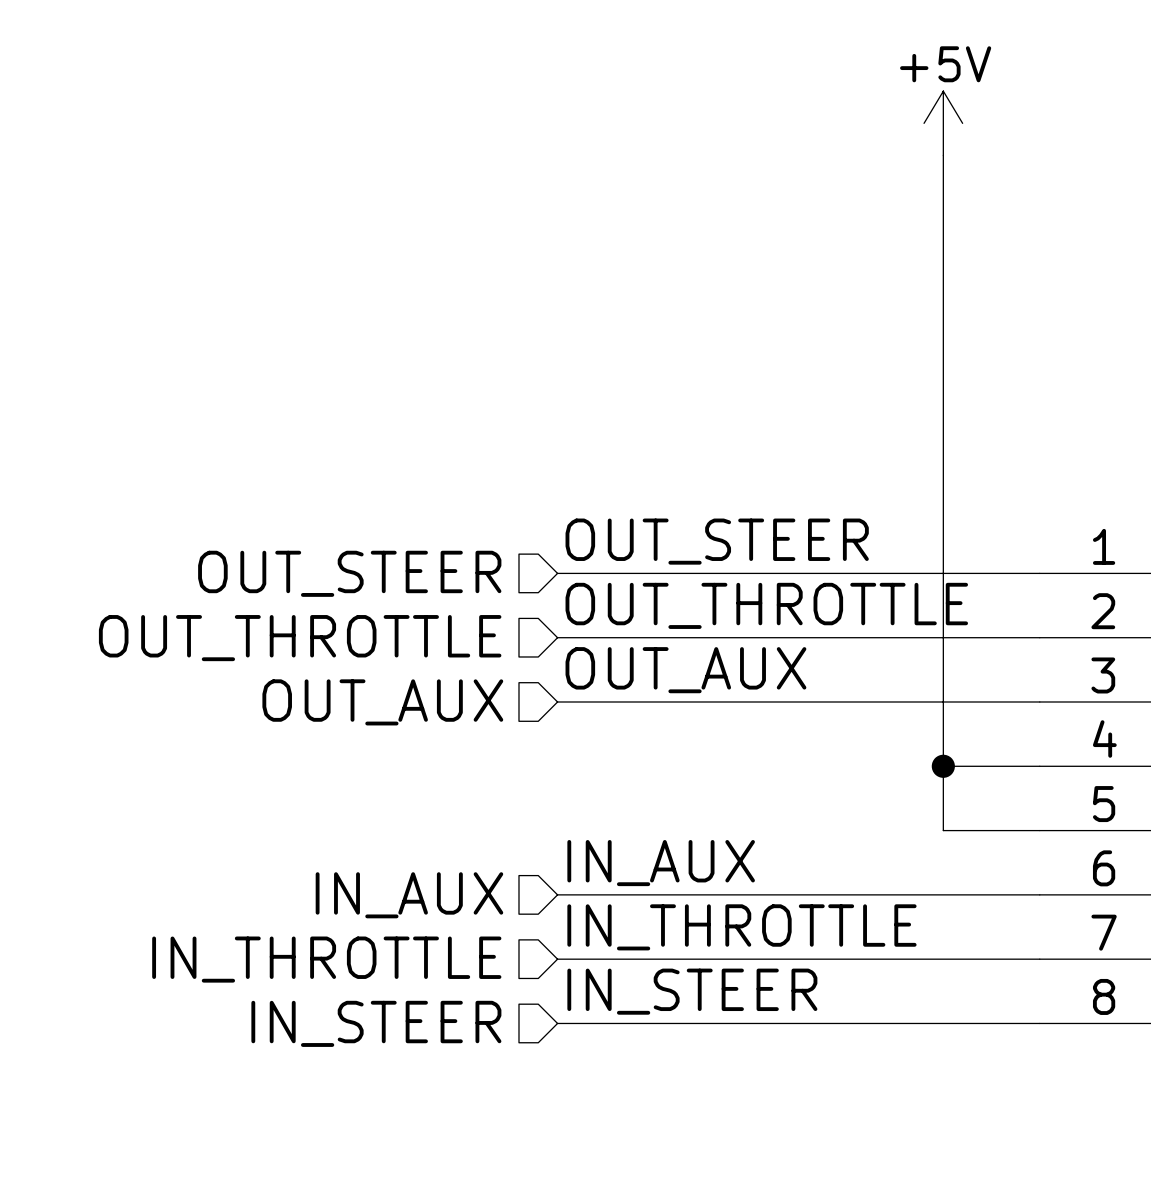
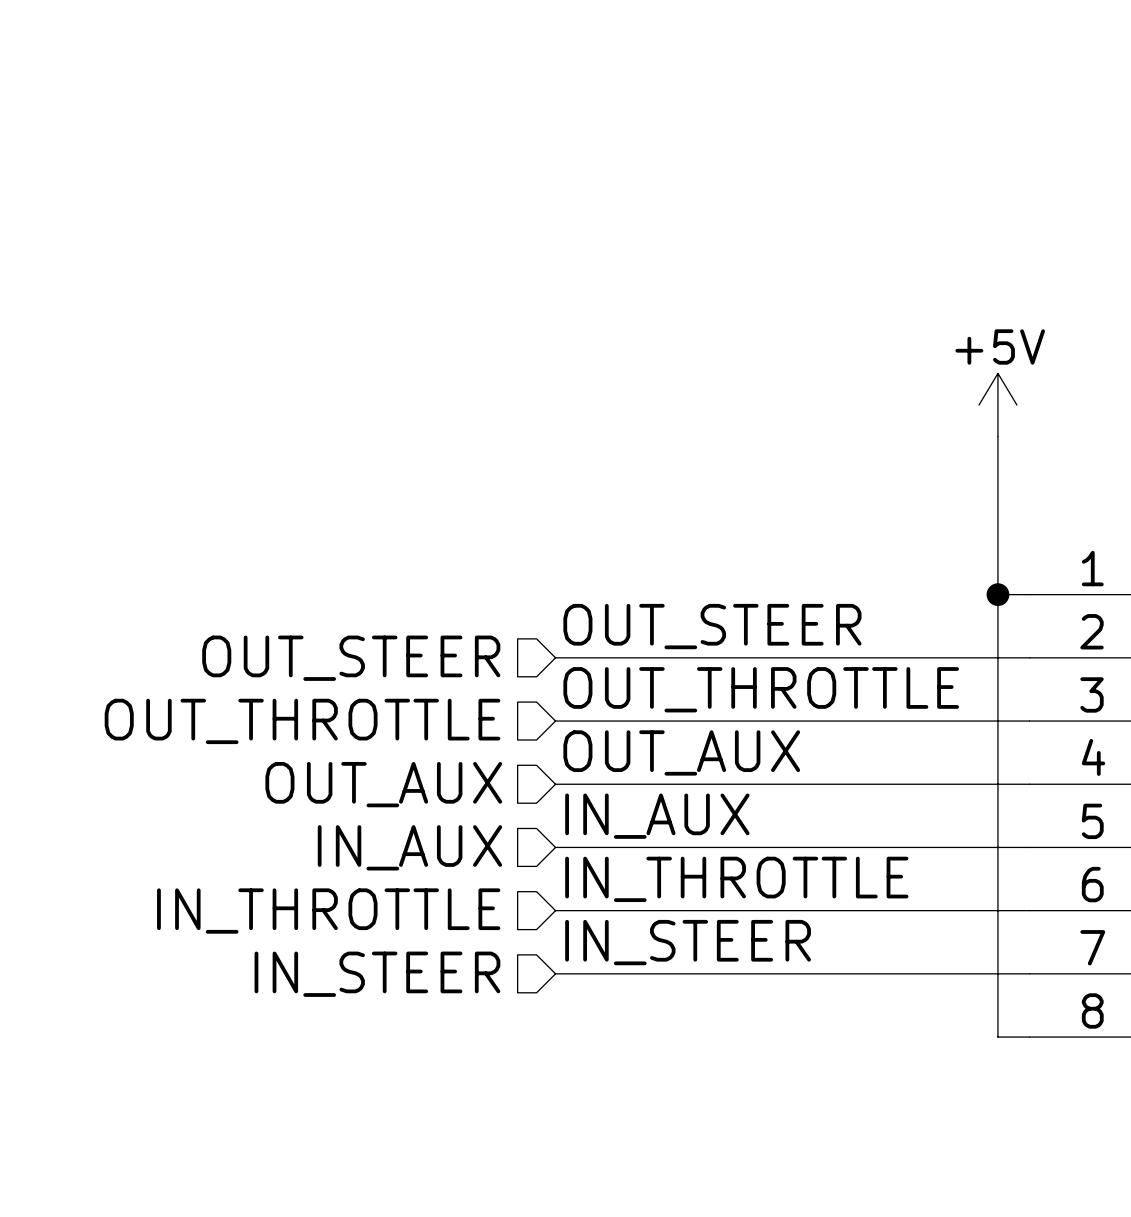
power symbol position: +5V (943, 123) -> +5V (997, 405)
wire: (943, 155) (943, 830) -> (555, 847) (934, 847)
label: OUT_STEER (717, 541) -> none
hierarchical label: OUT_STEER (349, 573) -> none
wire: (557, 573) (1007, 573) -> none
junction: none -> (997, 594)
label: OUT_THROTTLE (766, 605) -> OUT_STEER (712, 626)
hierarchical label: OUT_THROTTLE (300, 638) -> OUT_STEER (351, 658)
label: OUT_AUX (685, 670) -> OUT_THROTTLE (761, 689)
hierarchical label: OUT_AUX (382, 702) -> OUT_THROTTLE (302, 721)
label: none -> OUT_AUX (681, 752)
hierarchical label: none -> OUT_AUX (383, 784)
wire: none -> (555, 784) (934, 784)
junction: (943, 766) -> none
label: none -> IN_AUX (657, 816)
hierarchical label: none -> IN_AUX (409, 847)
label: IN_AUX (661, 863) -> IN_THROTTLE (736, 879)
hierarchical label: IN_AUX (409, 895) -> IN_THROTTLE (328, 911)
label: IN_THROTTLE (741, 927) -> IN_STEER (688, 942)
hierarchical label: IN_THROTTLE (326, 959) -> IN_STEER (377, 974)
label: IN_STEER (692, 991) -> none
hierarchical label: IN_STEER (376, 1023) -> none
wire: (557, 1023) (1007, 1023) -> (997, 436) (997, 1037)

